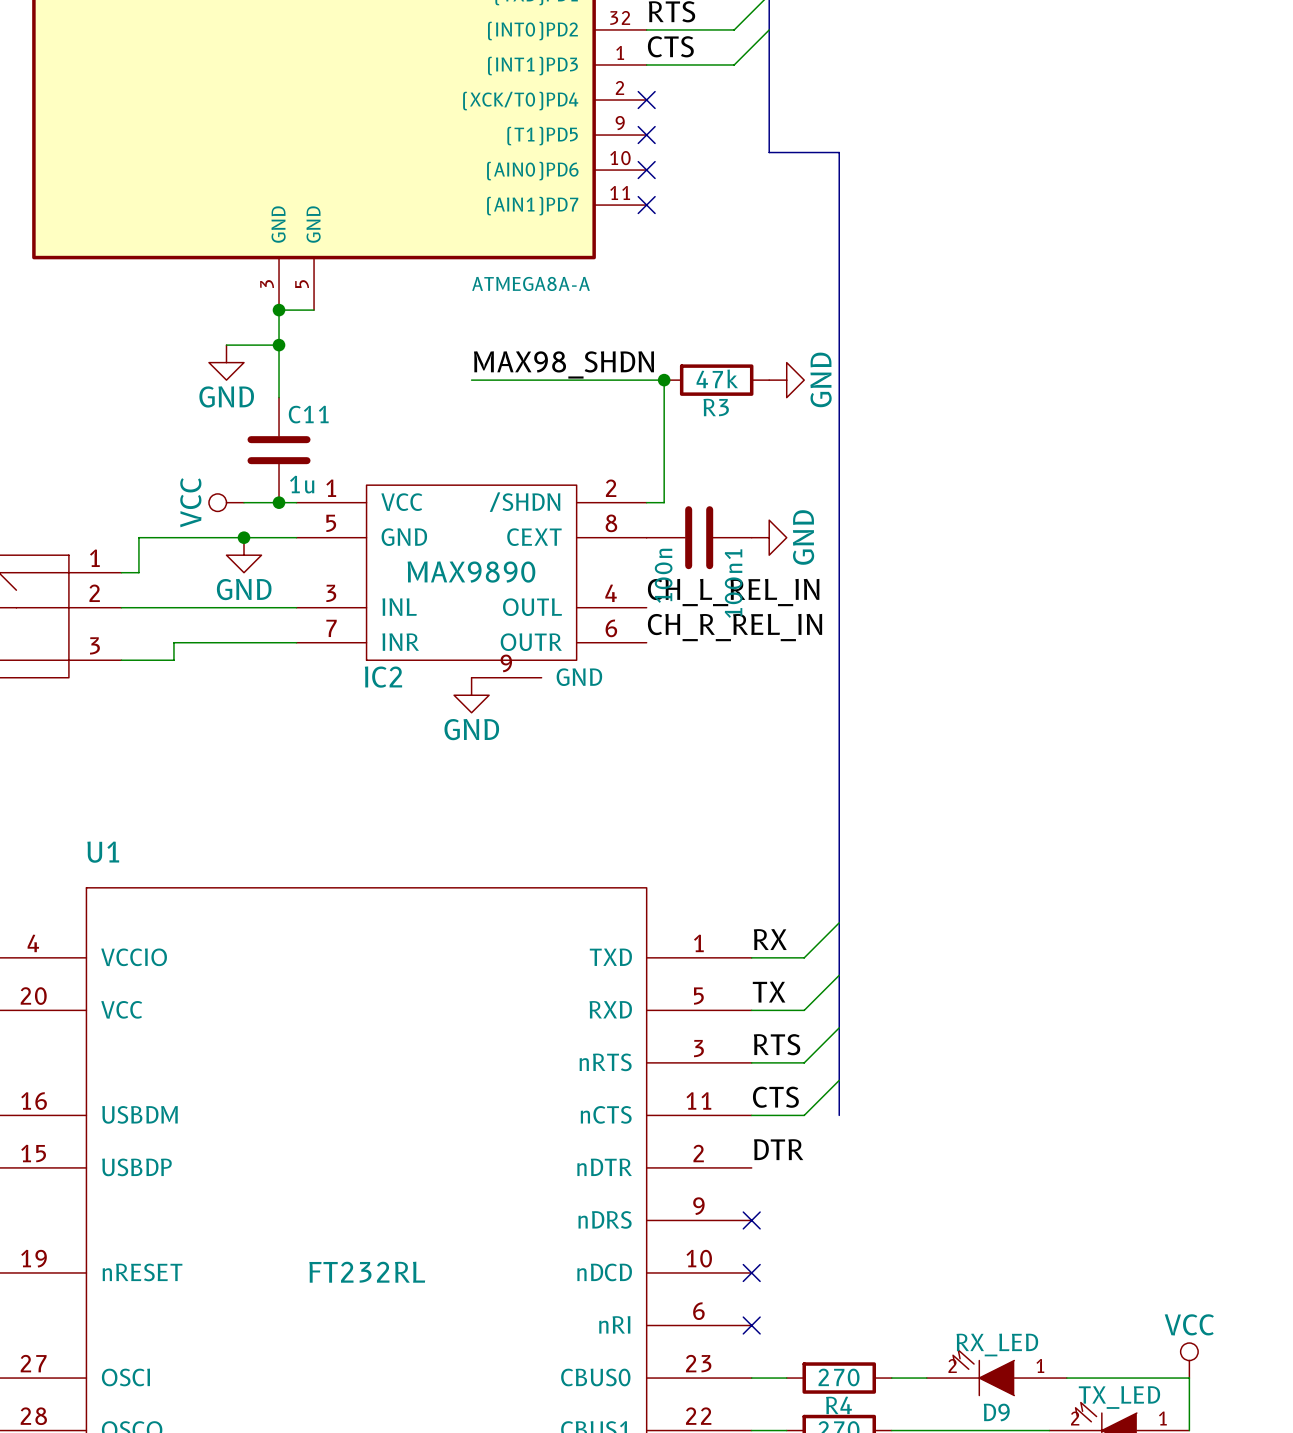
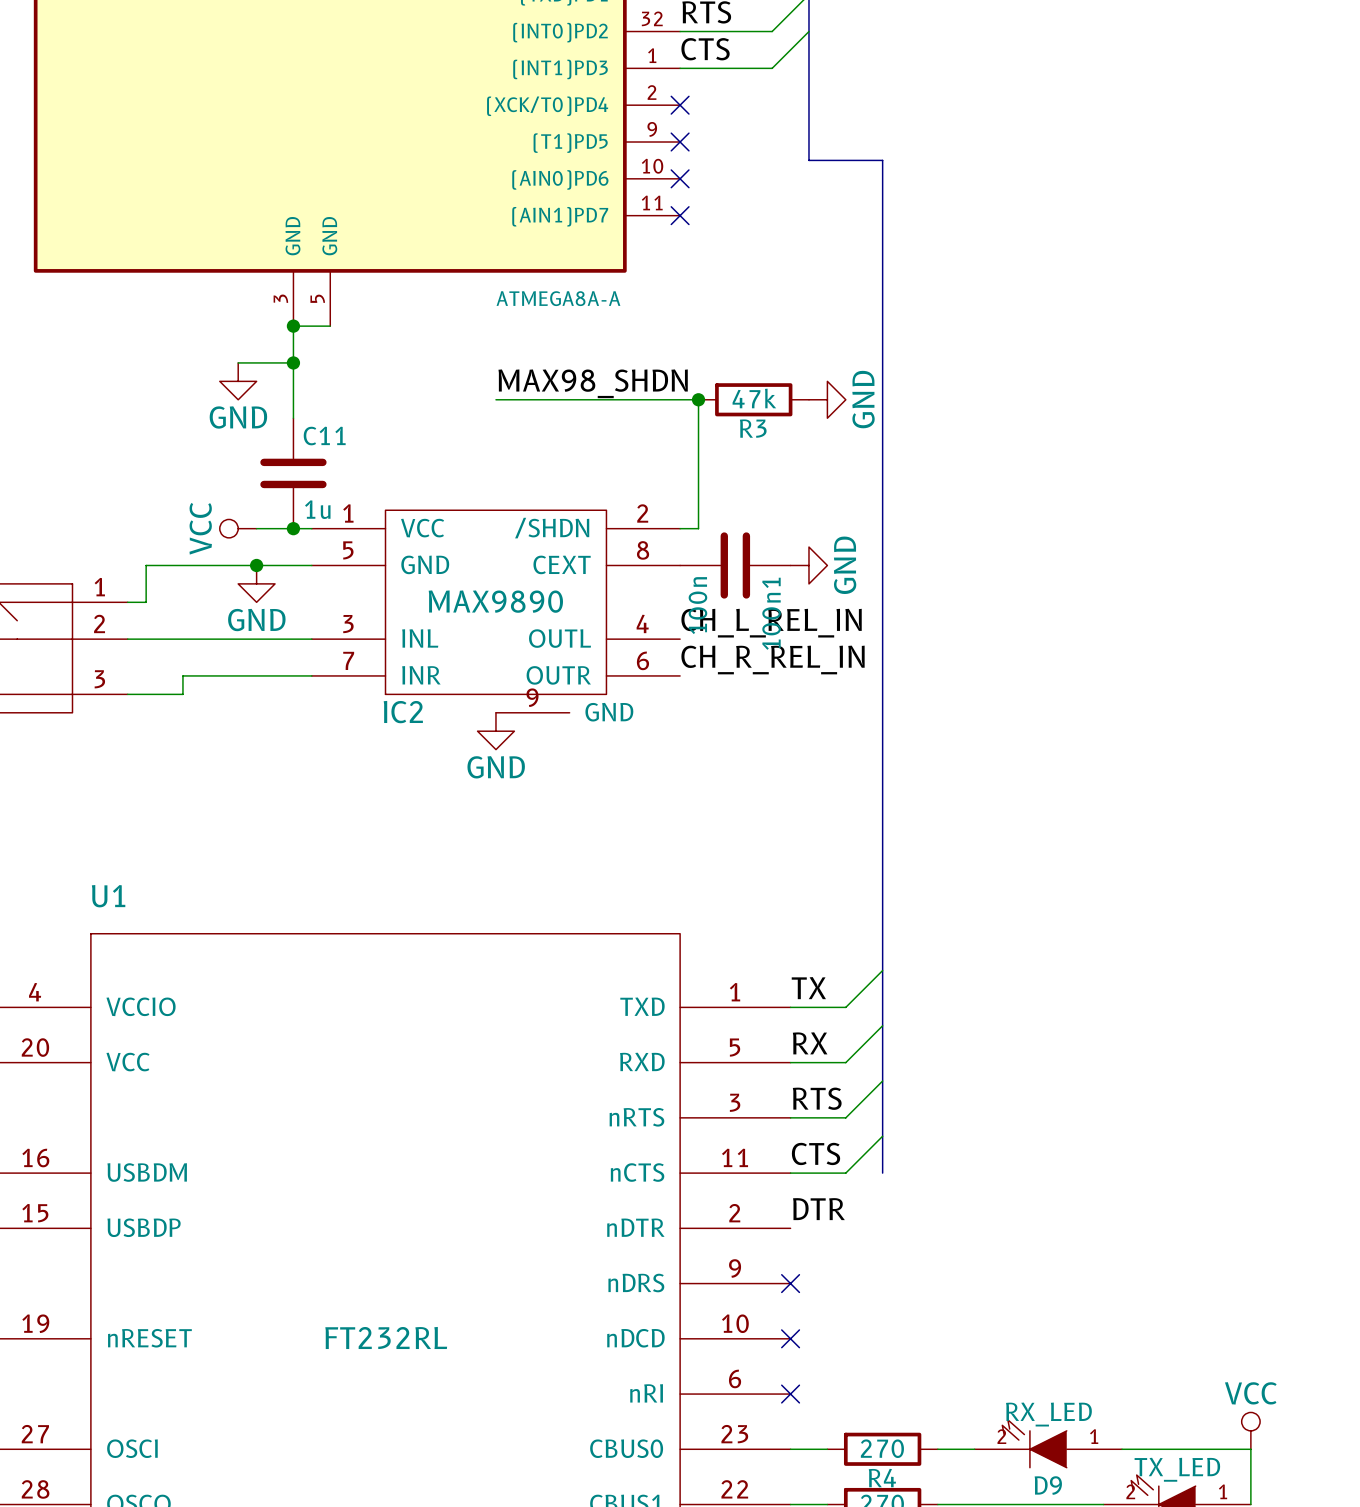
label: RX (770, 939) -> TX (808, 988)
label: TX (769, 992) -> RX (810, 1043)

